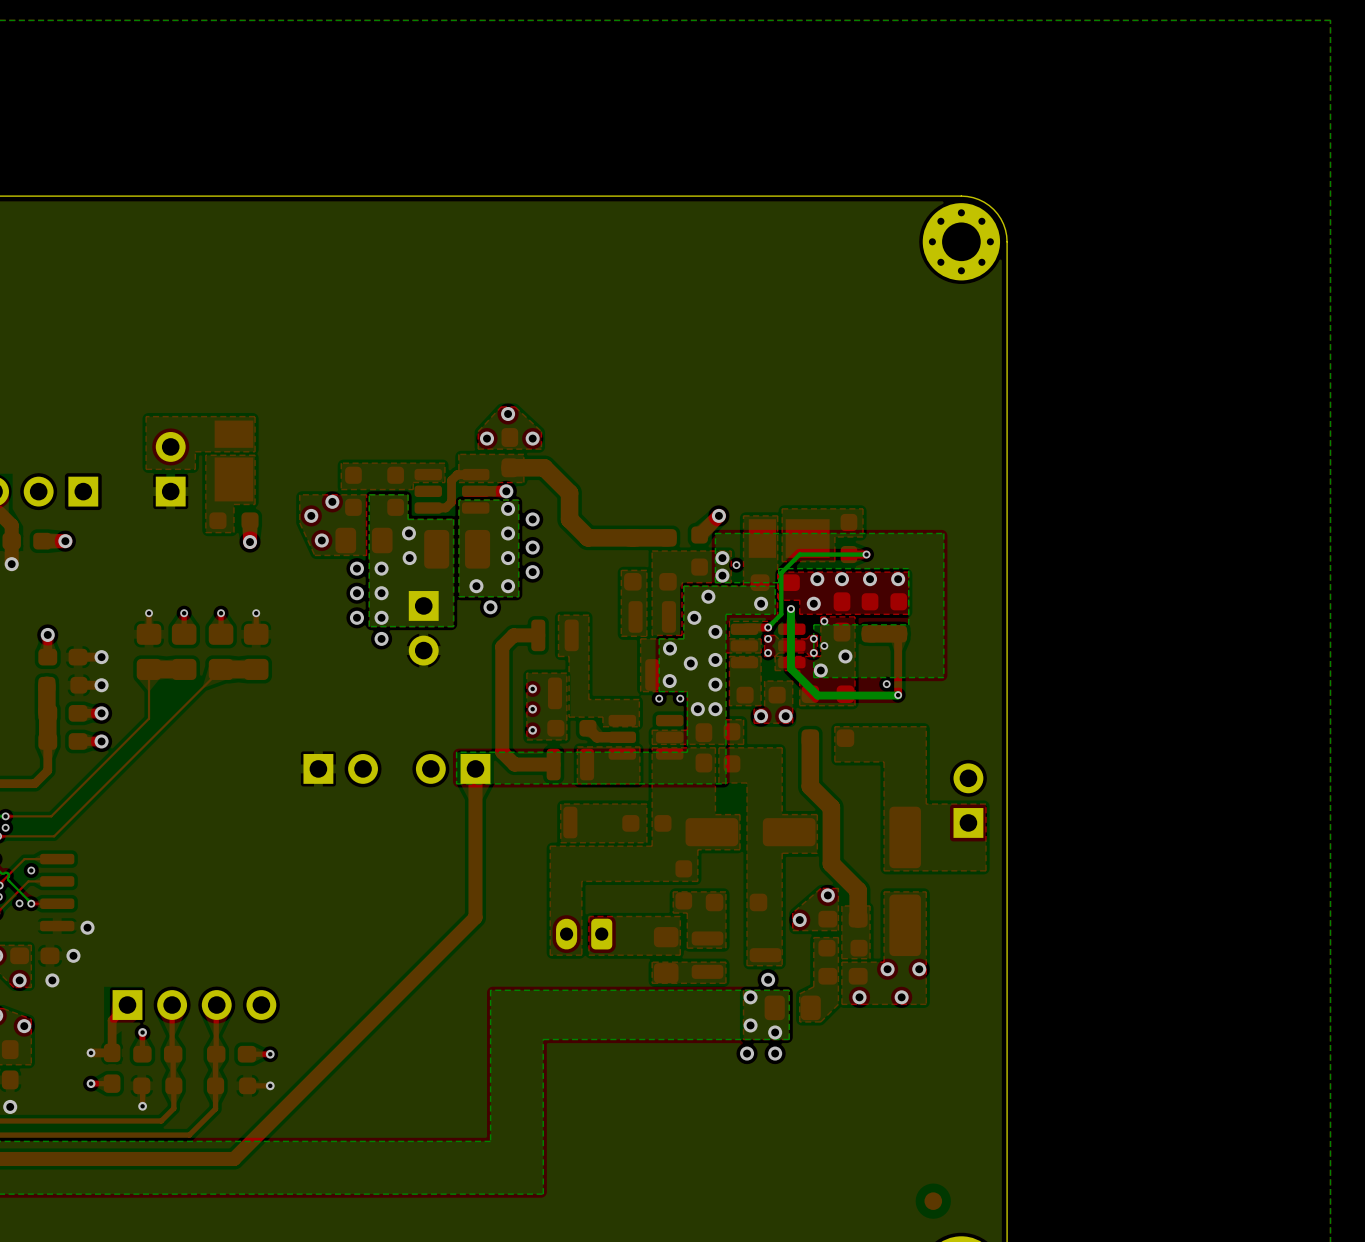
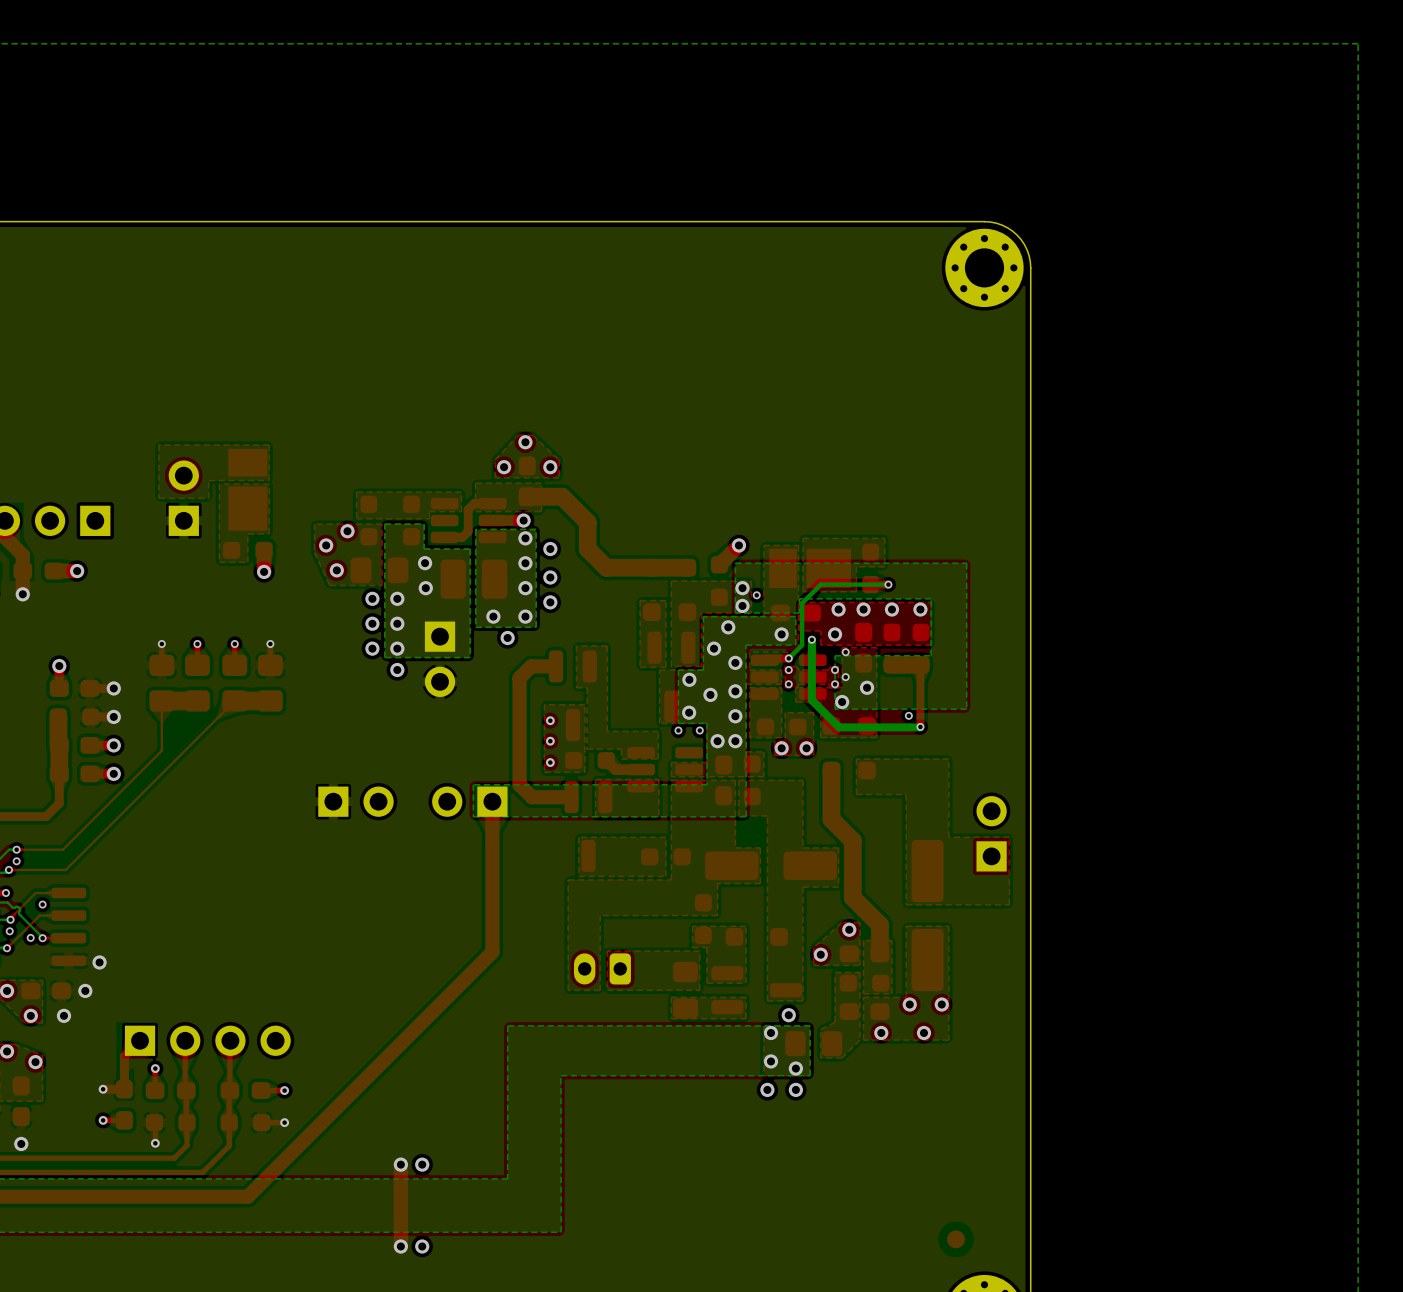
top track: none -> (400, 1164) (400, 1246)
via: none -> (400, 1164)
via: none -> (422, 1164)
via: none -> (400, 1246)
via: none -> (422, 1246)

